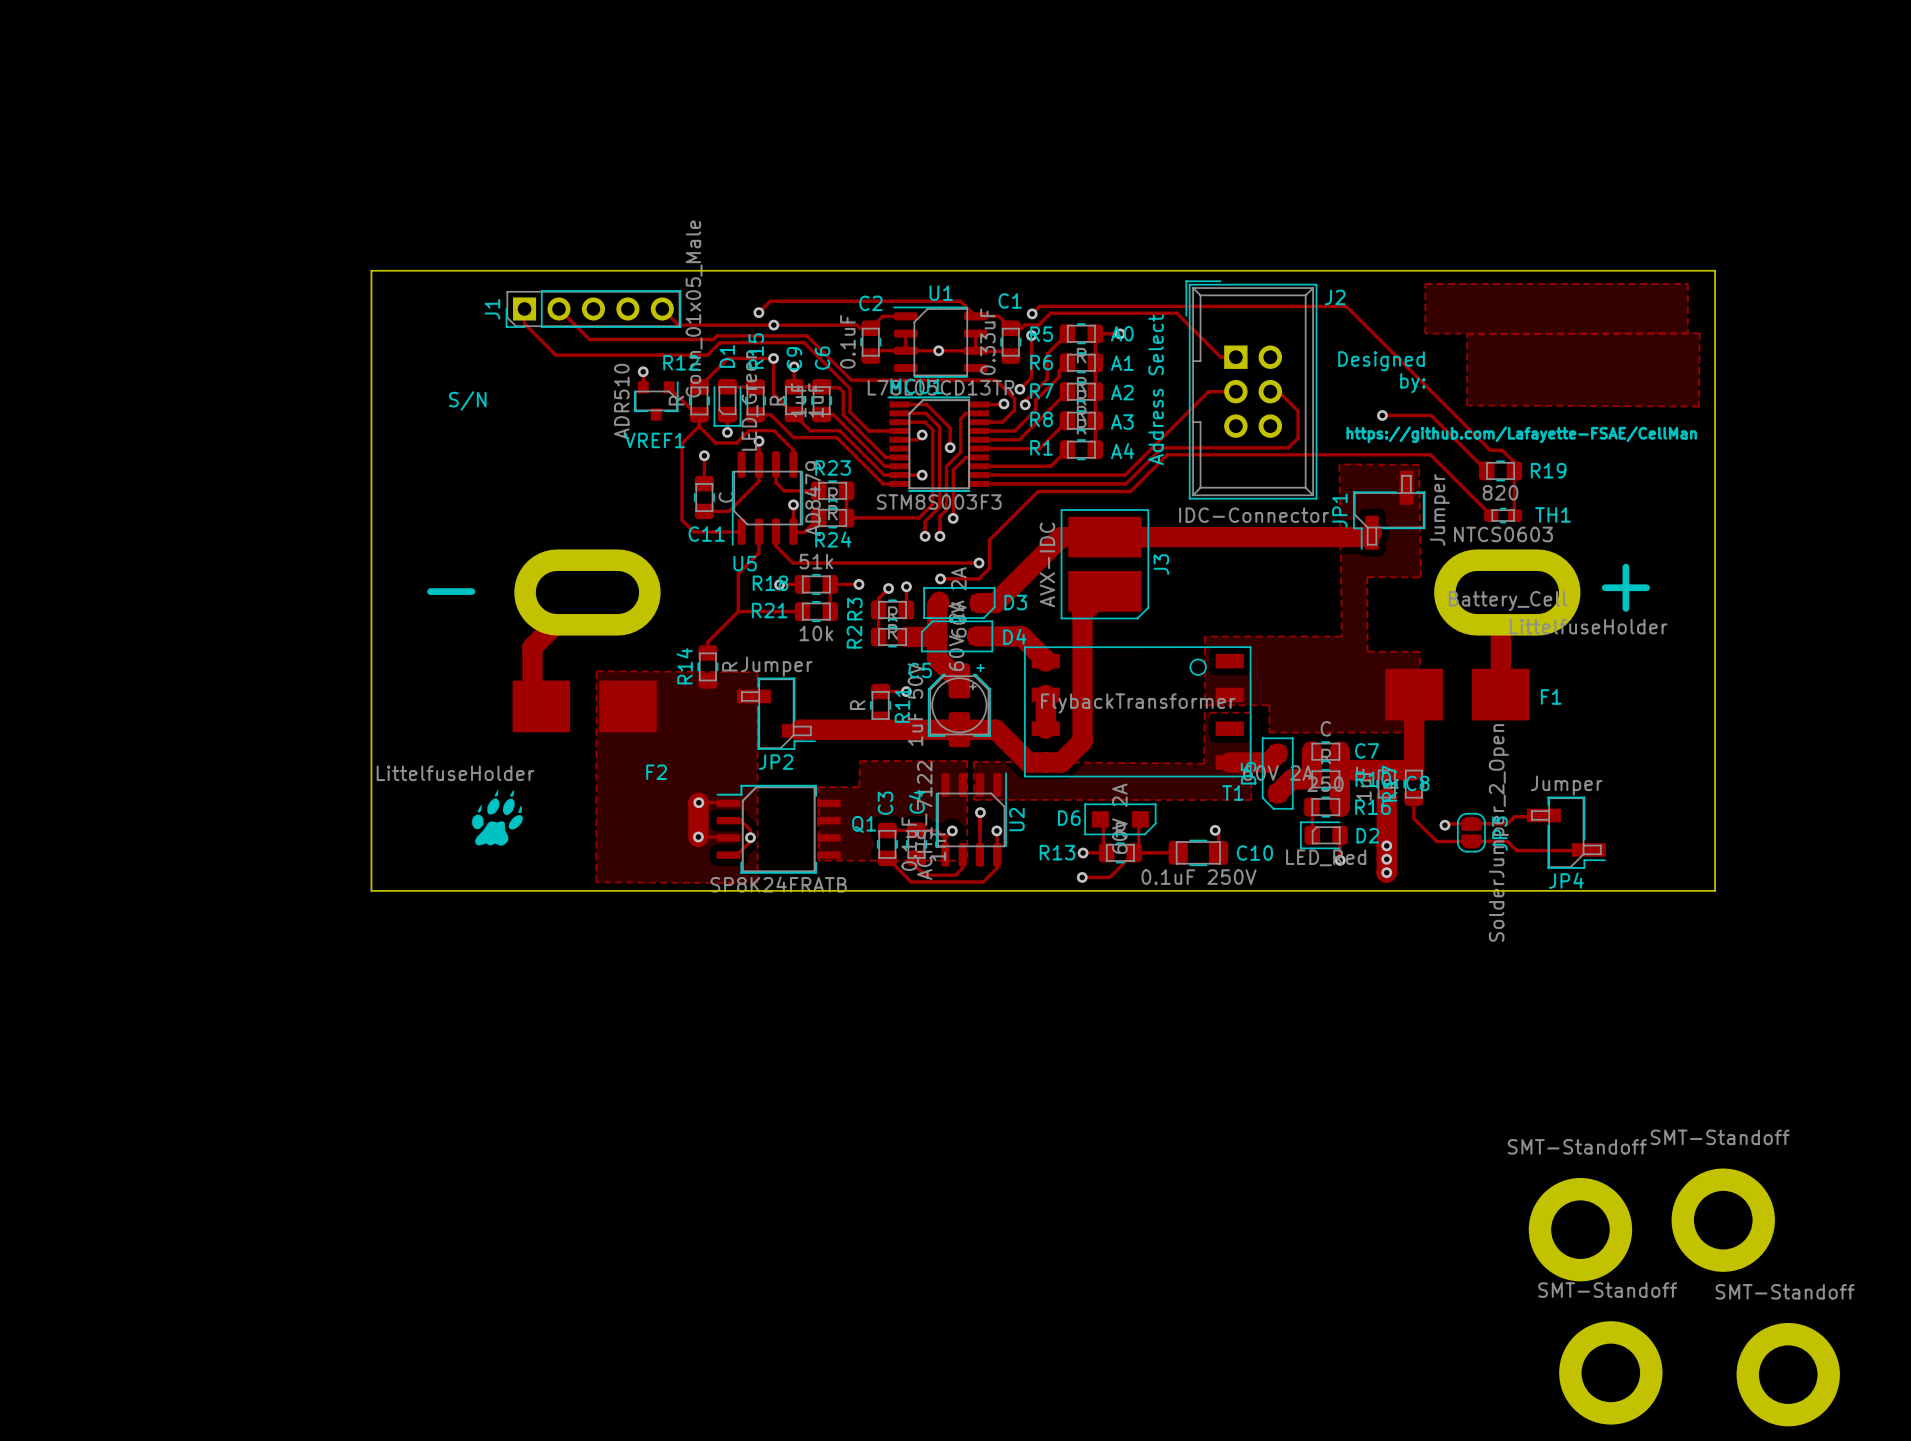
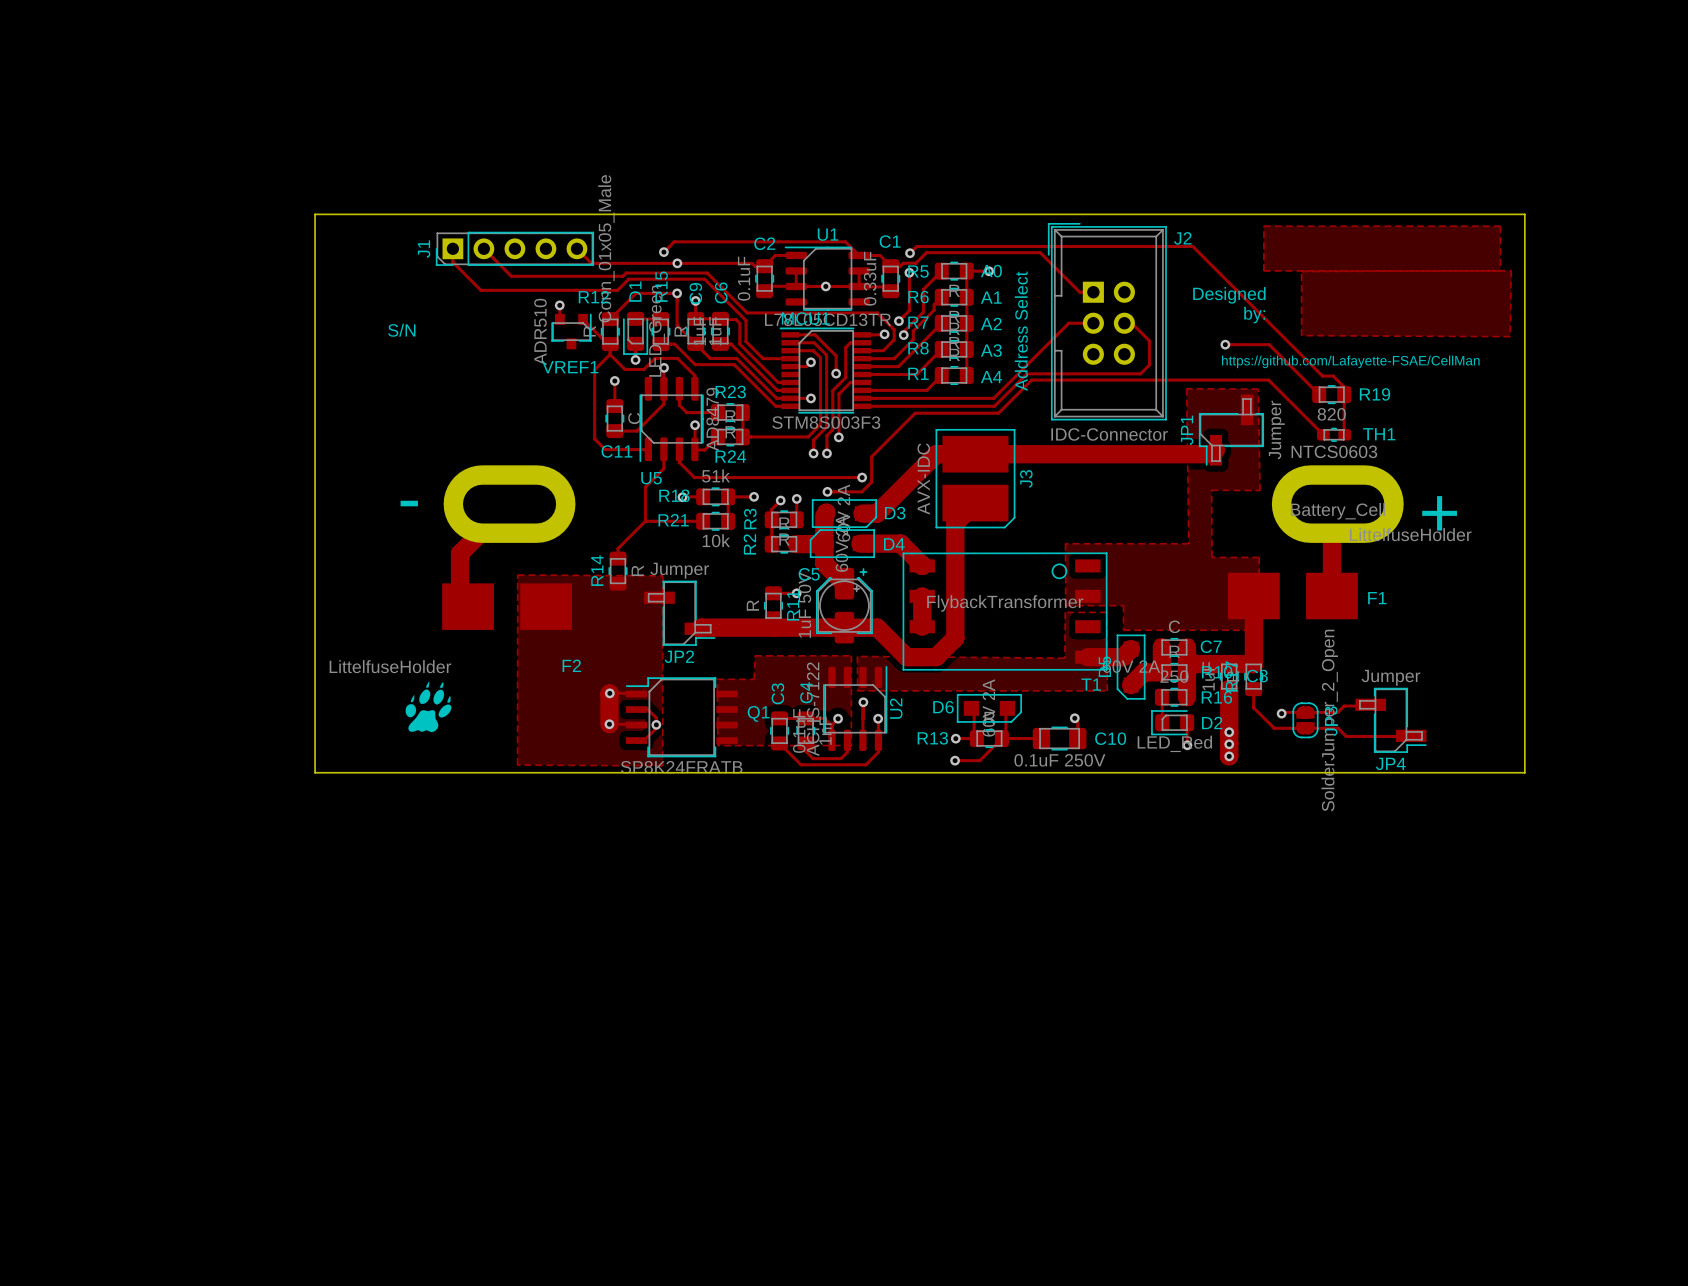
part: SMT-Standoff (1723, 1220) -> none
part: SMT-Standoff (1580, 1229) -> none
part: SMT-Standoff (1610, 1372) -> none
part: SMT-Standoff (1788, 1374) -> none

